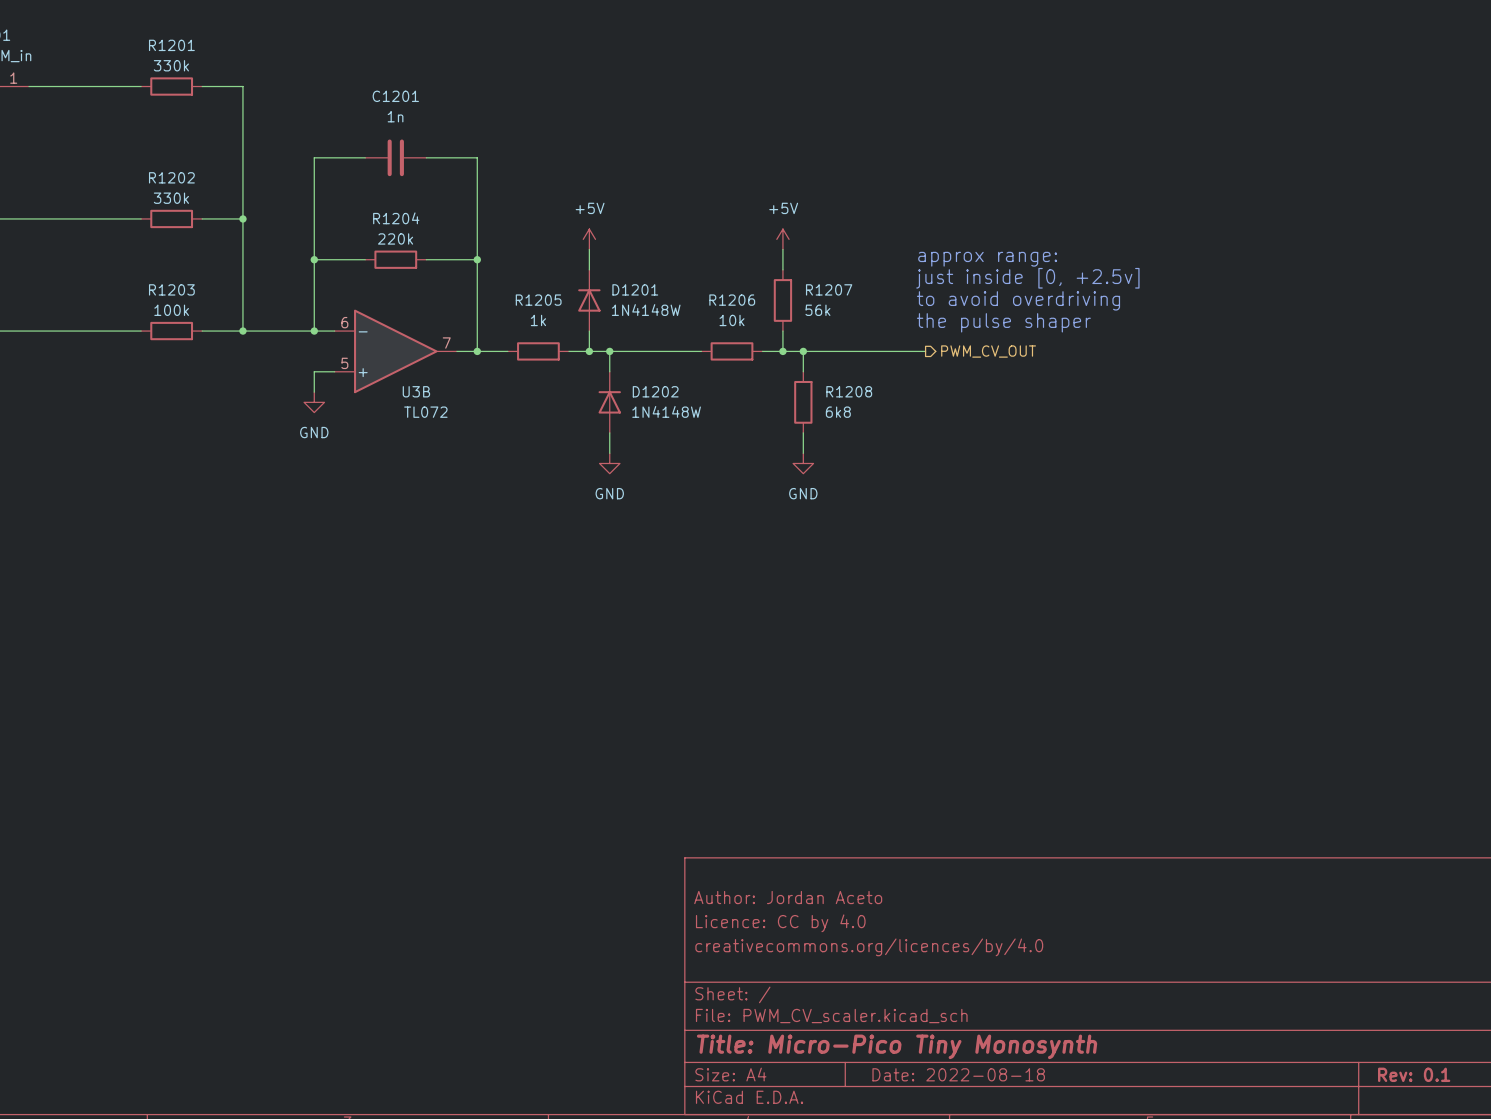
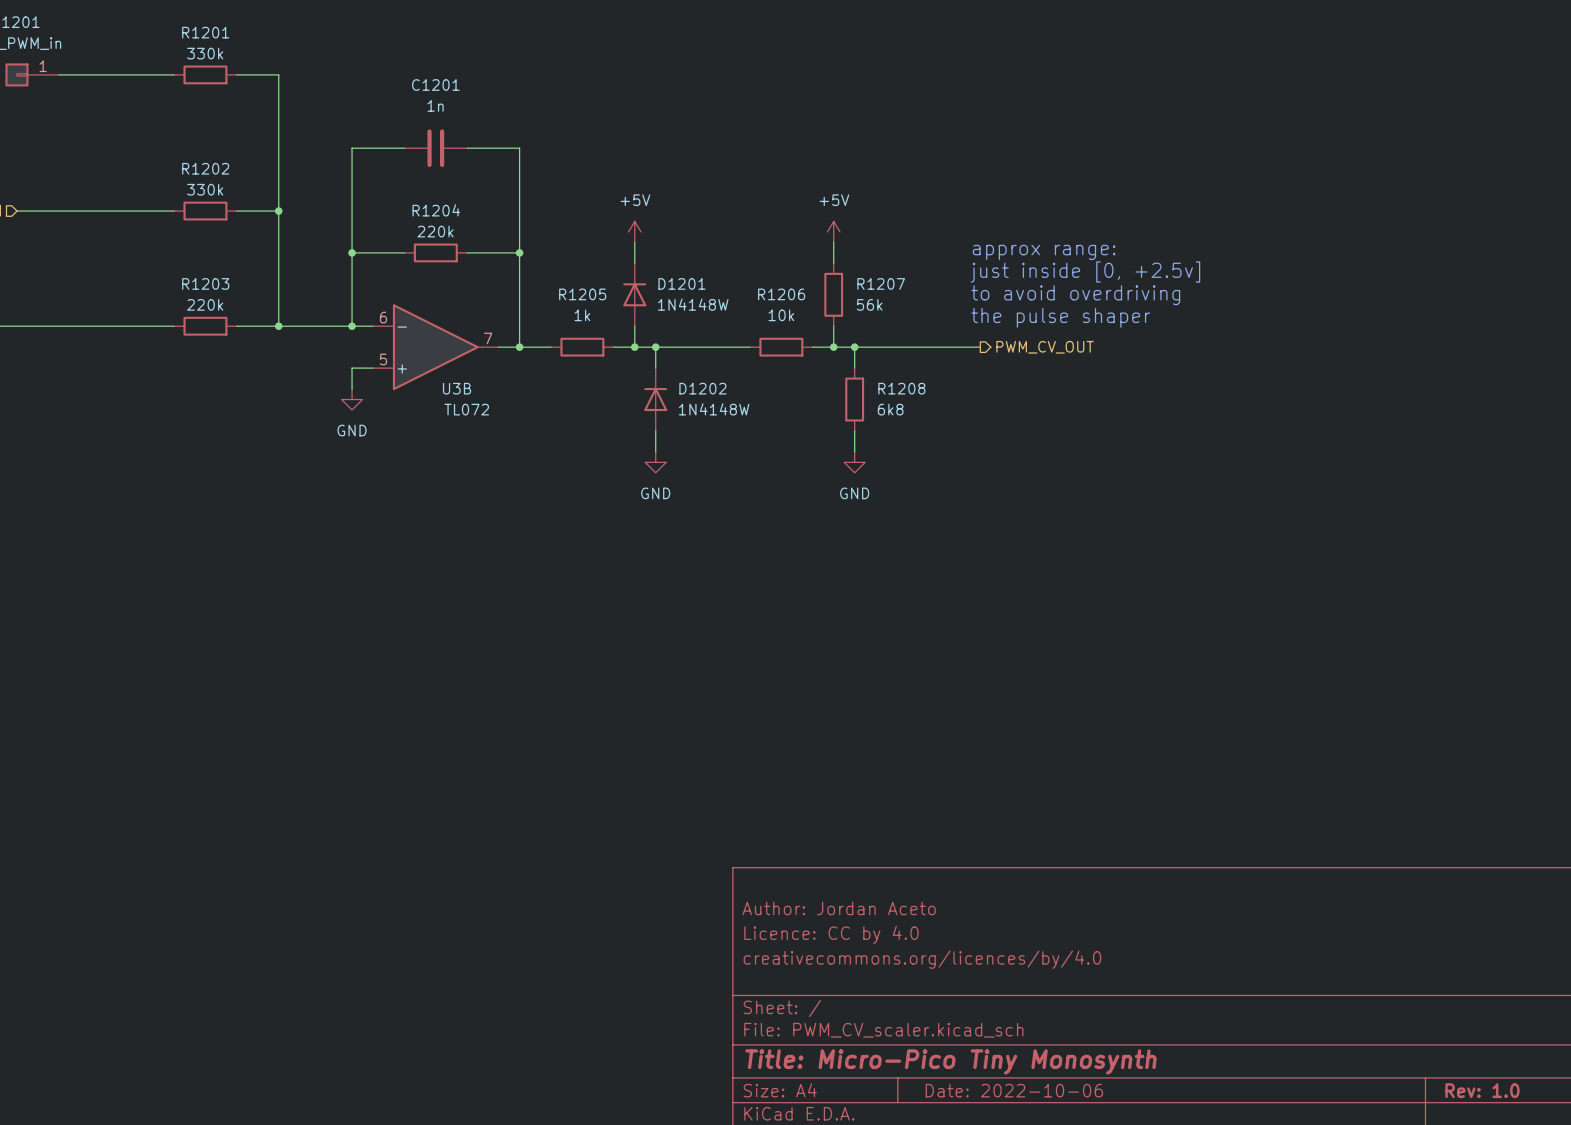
R1203 value: 100k (171, 310) -> 220k (205, 304)
title block: Date: 2022-08-18 (958, 1074) -> Date: 2022-10-06 (1014, 1090)
title block: Rev: 0.1 (1414, 1074) -> Rev: 1.0 (1482, 1090)

